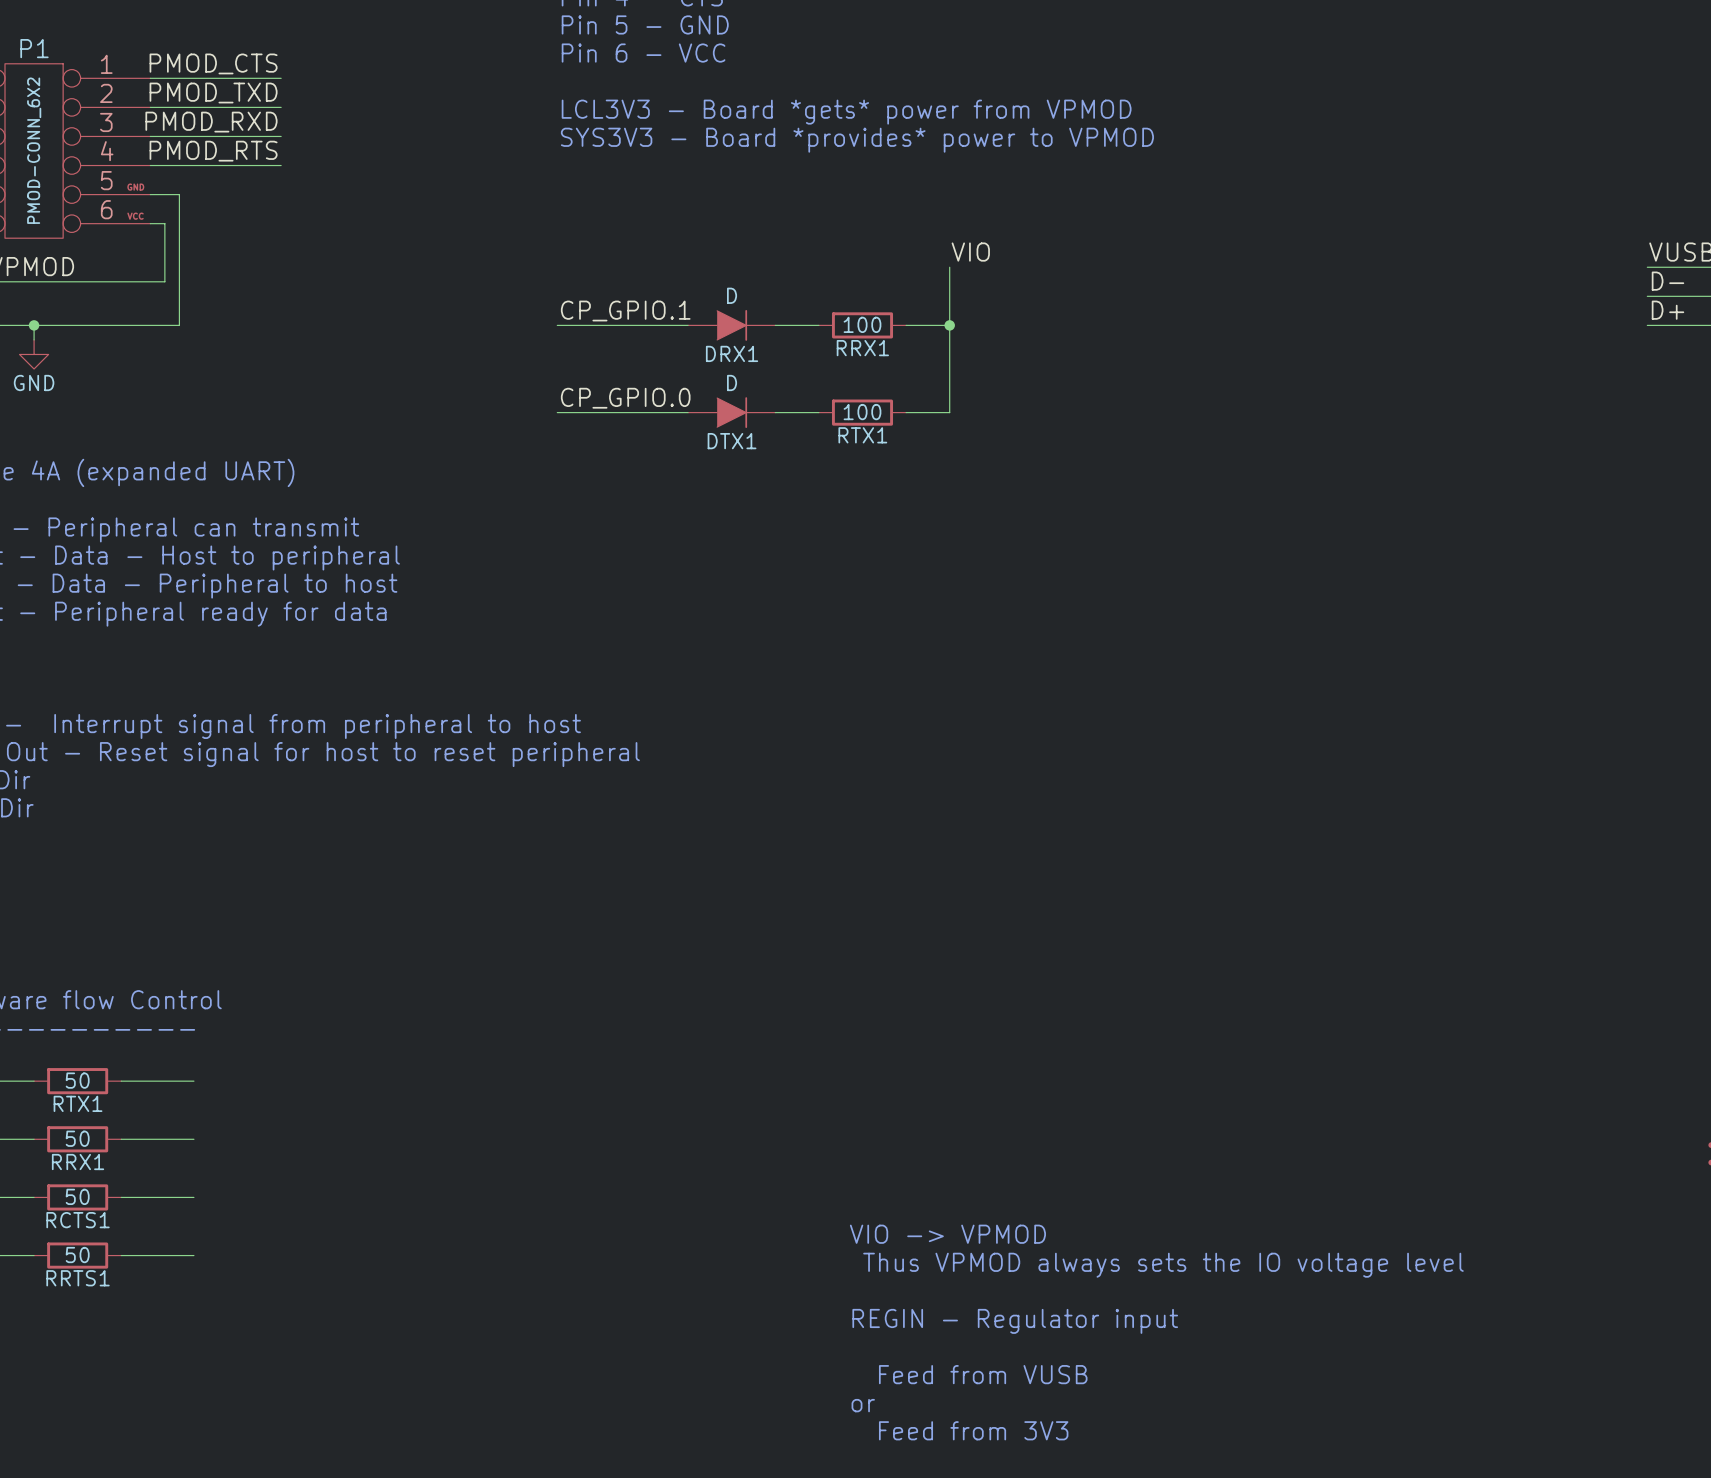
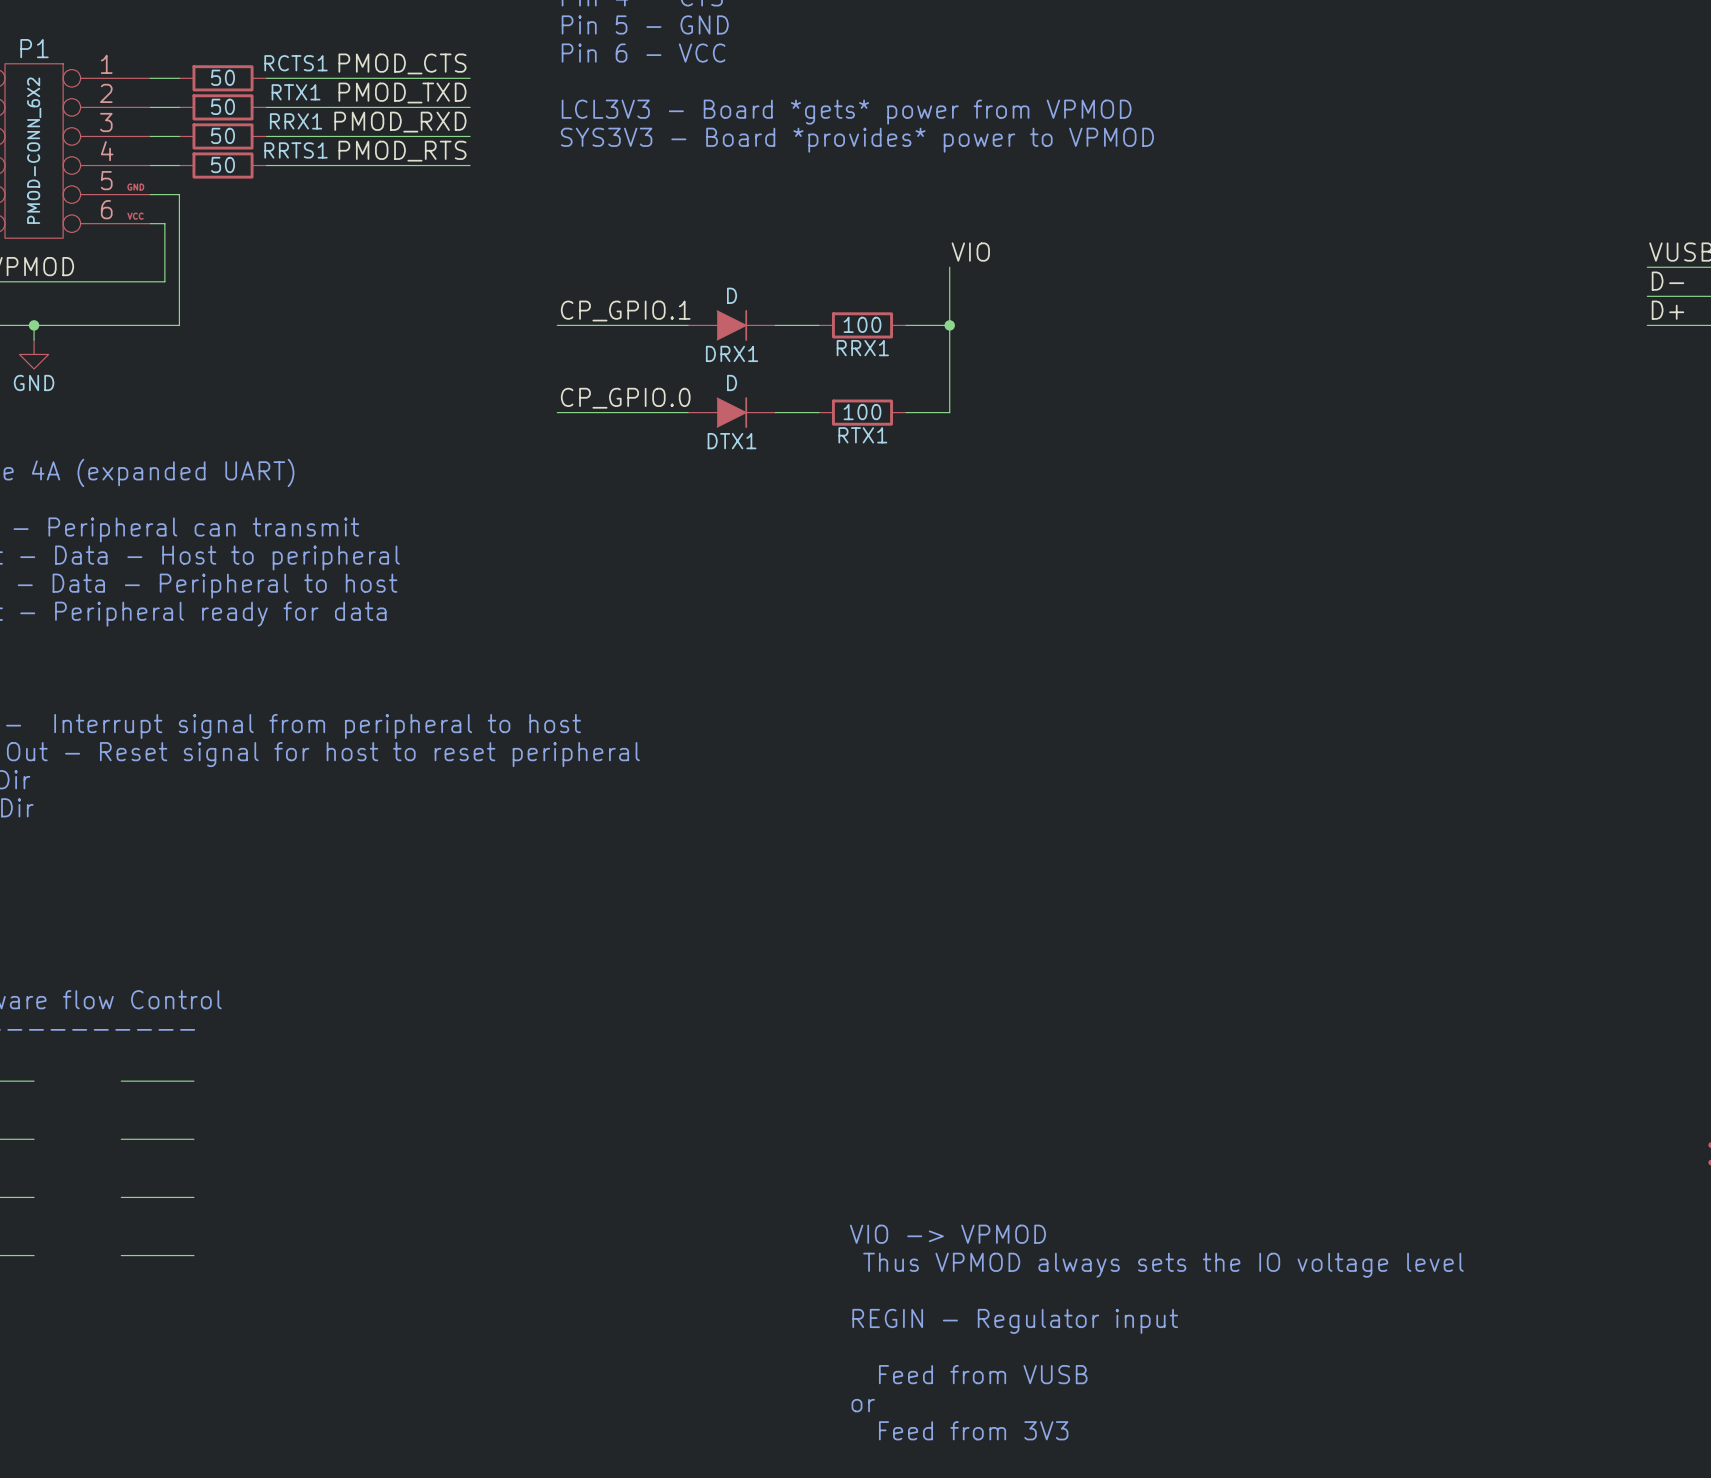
label position: PMOD_CTS (213, 63) -> PMOD_CTS (402, 63)
wire: (179, 78) (266, 78) -> none
wire: none -> (281, 78) (470, 78)
label position: PMOD_TXD (213, 93) -> PMOD_TXD (402, 93)
wire: (179, 107) (266, 107) -> none
RTX1: none -> 50 (223, 107)
wire: none -> (281, 107) (470, 107)
label position: PMOD_RXD (211, 122) -> PMOD_RXD (400, 122)
wire: (179, 136) (266, 136) -> none
RRX1: none -> 50 (223, 136)
wire: none -> (281, 136) (470, 136)
label position: PMOD_RTS (213, 151) -> PMOD_RTS (402, 151)
wire: (179, 165) (266, 165) -> none
wire: none -> (281, 165) (470, 165)
RTX1: 50 (77, 1081) -> none
RRX1: 50 (77, 1139) -> none
RCTS1 position: (77, 1197) -> (223, 78)
RCTS1 name position: RCTS1 (78, 1220) -> RCTS1 (296, 63)
RRTS1 position: (77, 1255) -> (223, 165)
RRTS1 name position: RRTS1 (78, 1278) -> RRTS1 (296, 150)

